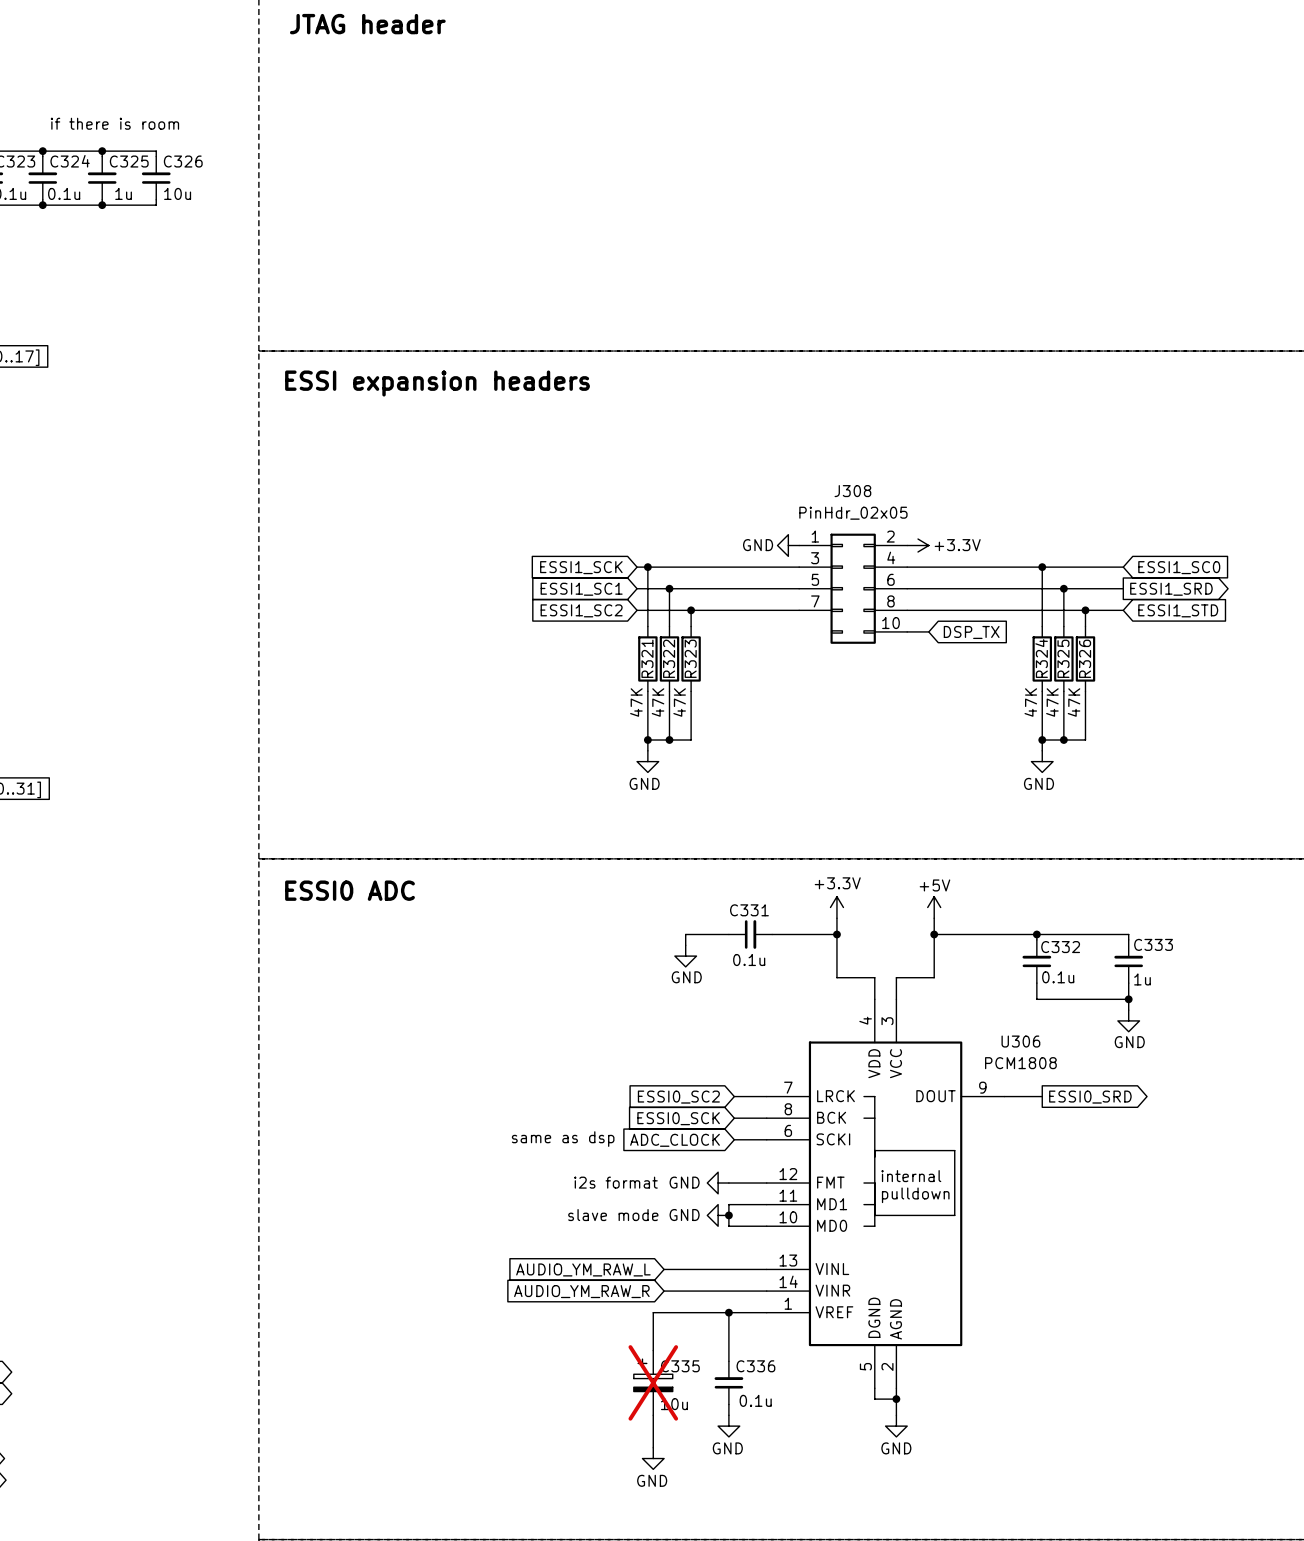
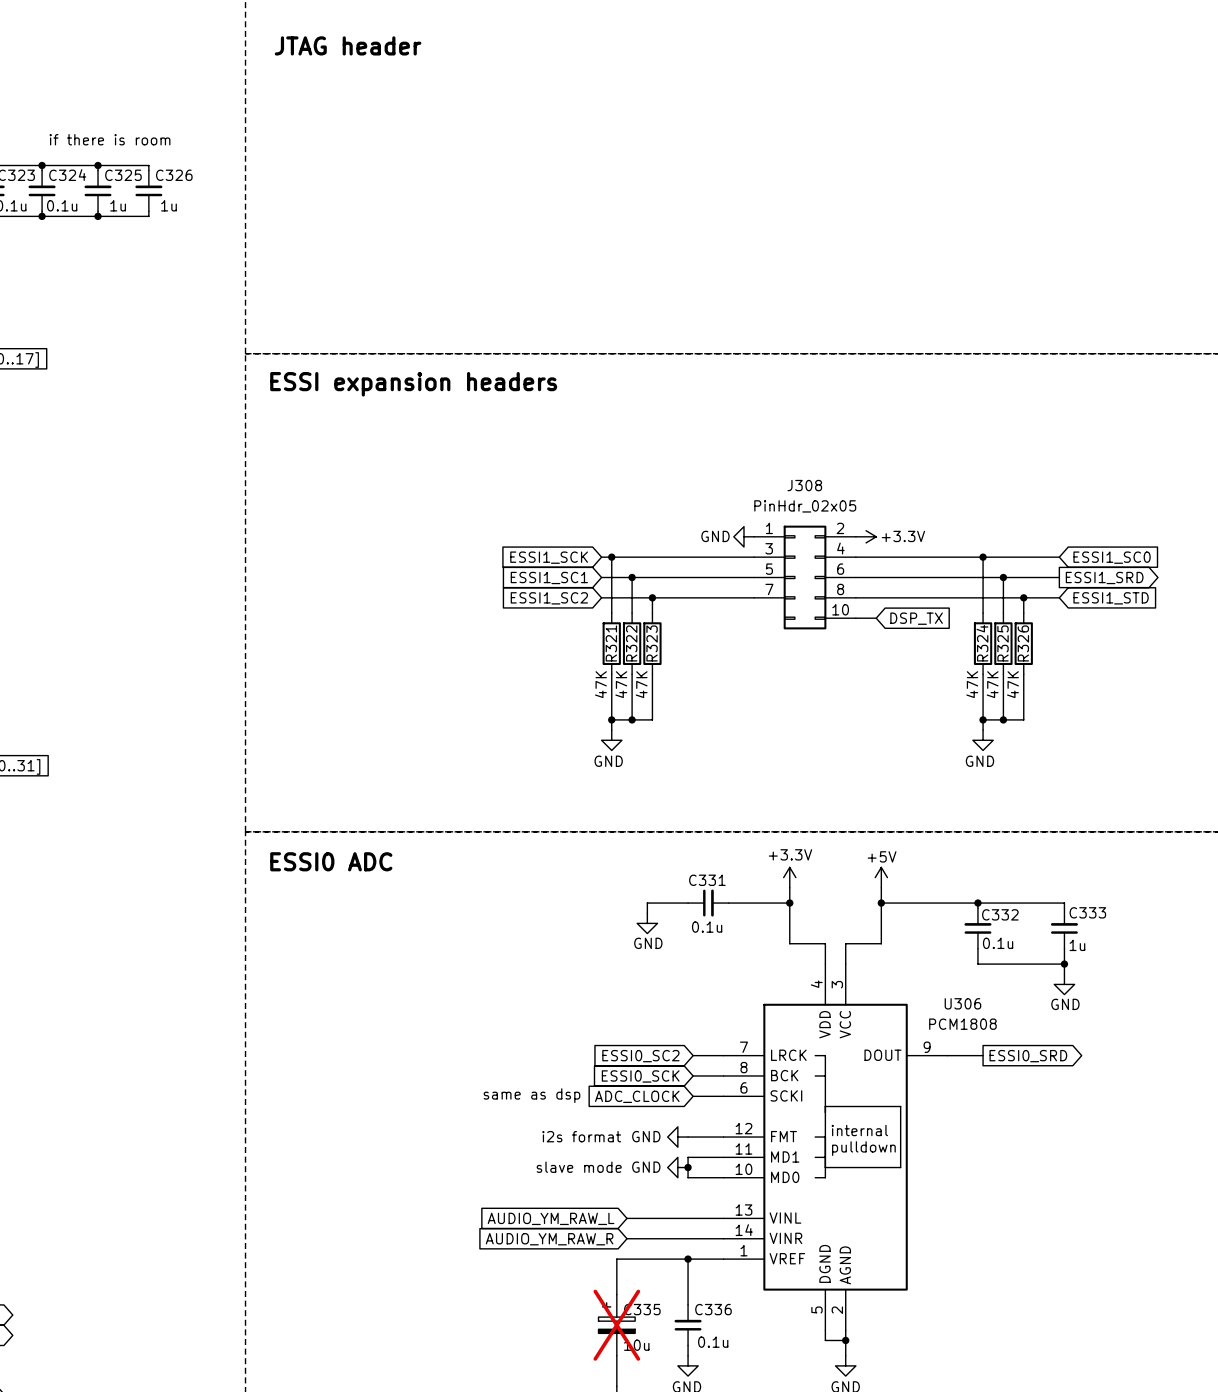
C326 value: 10u (177, 193) -> 1u (168, 205)

